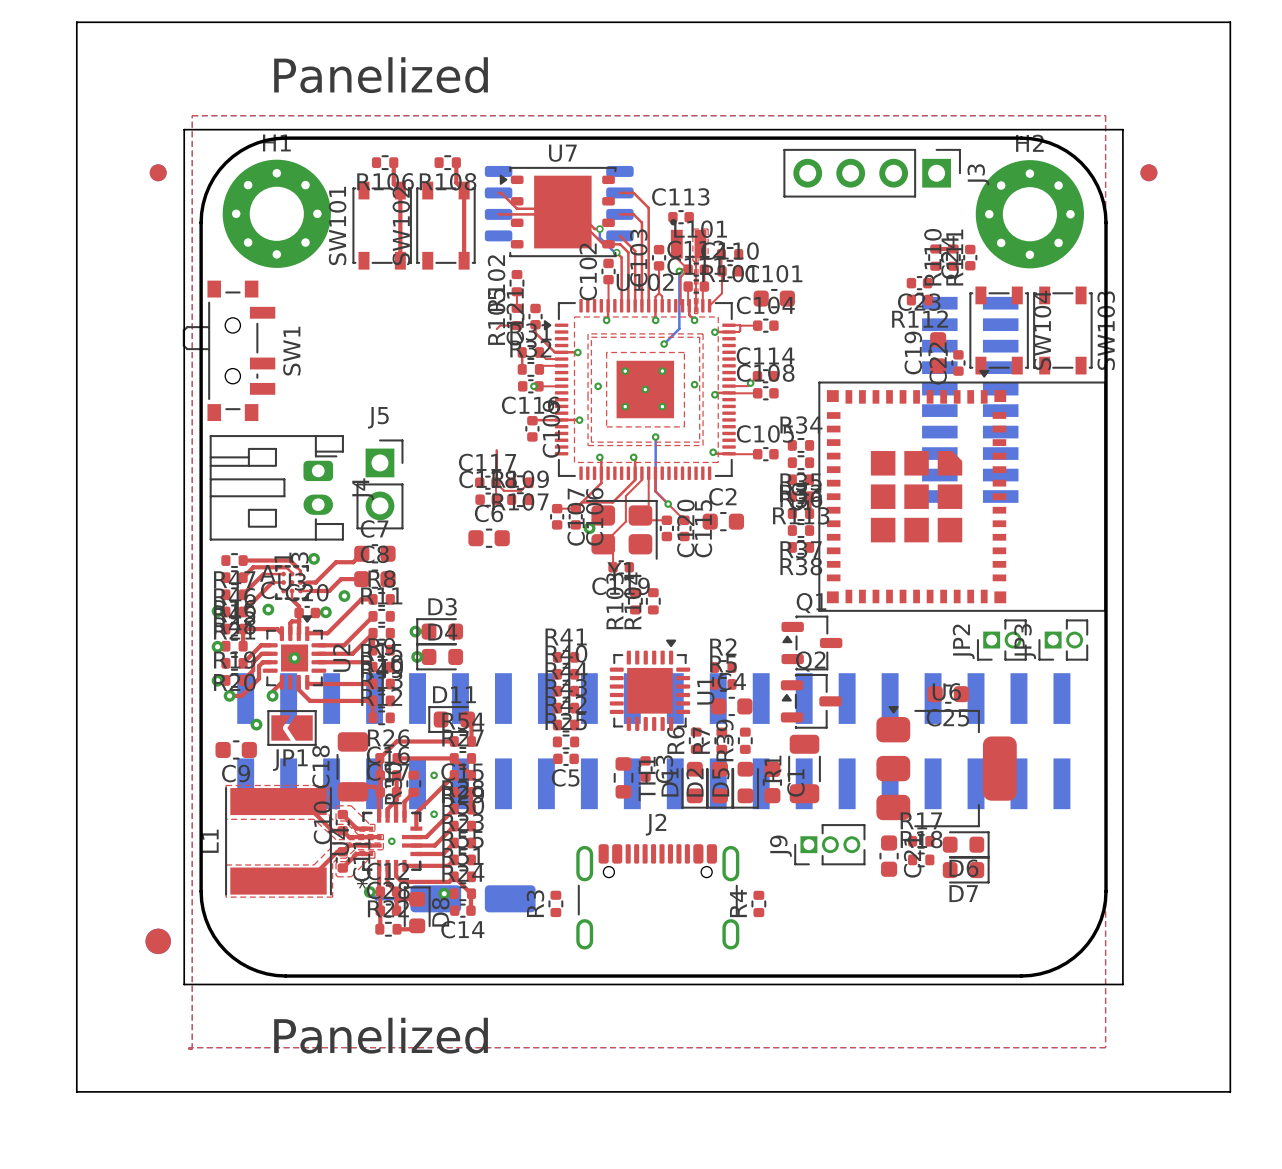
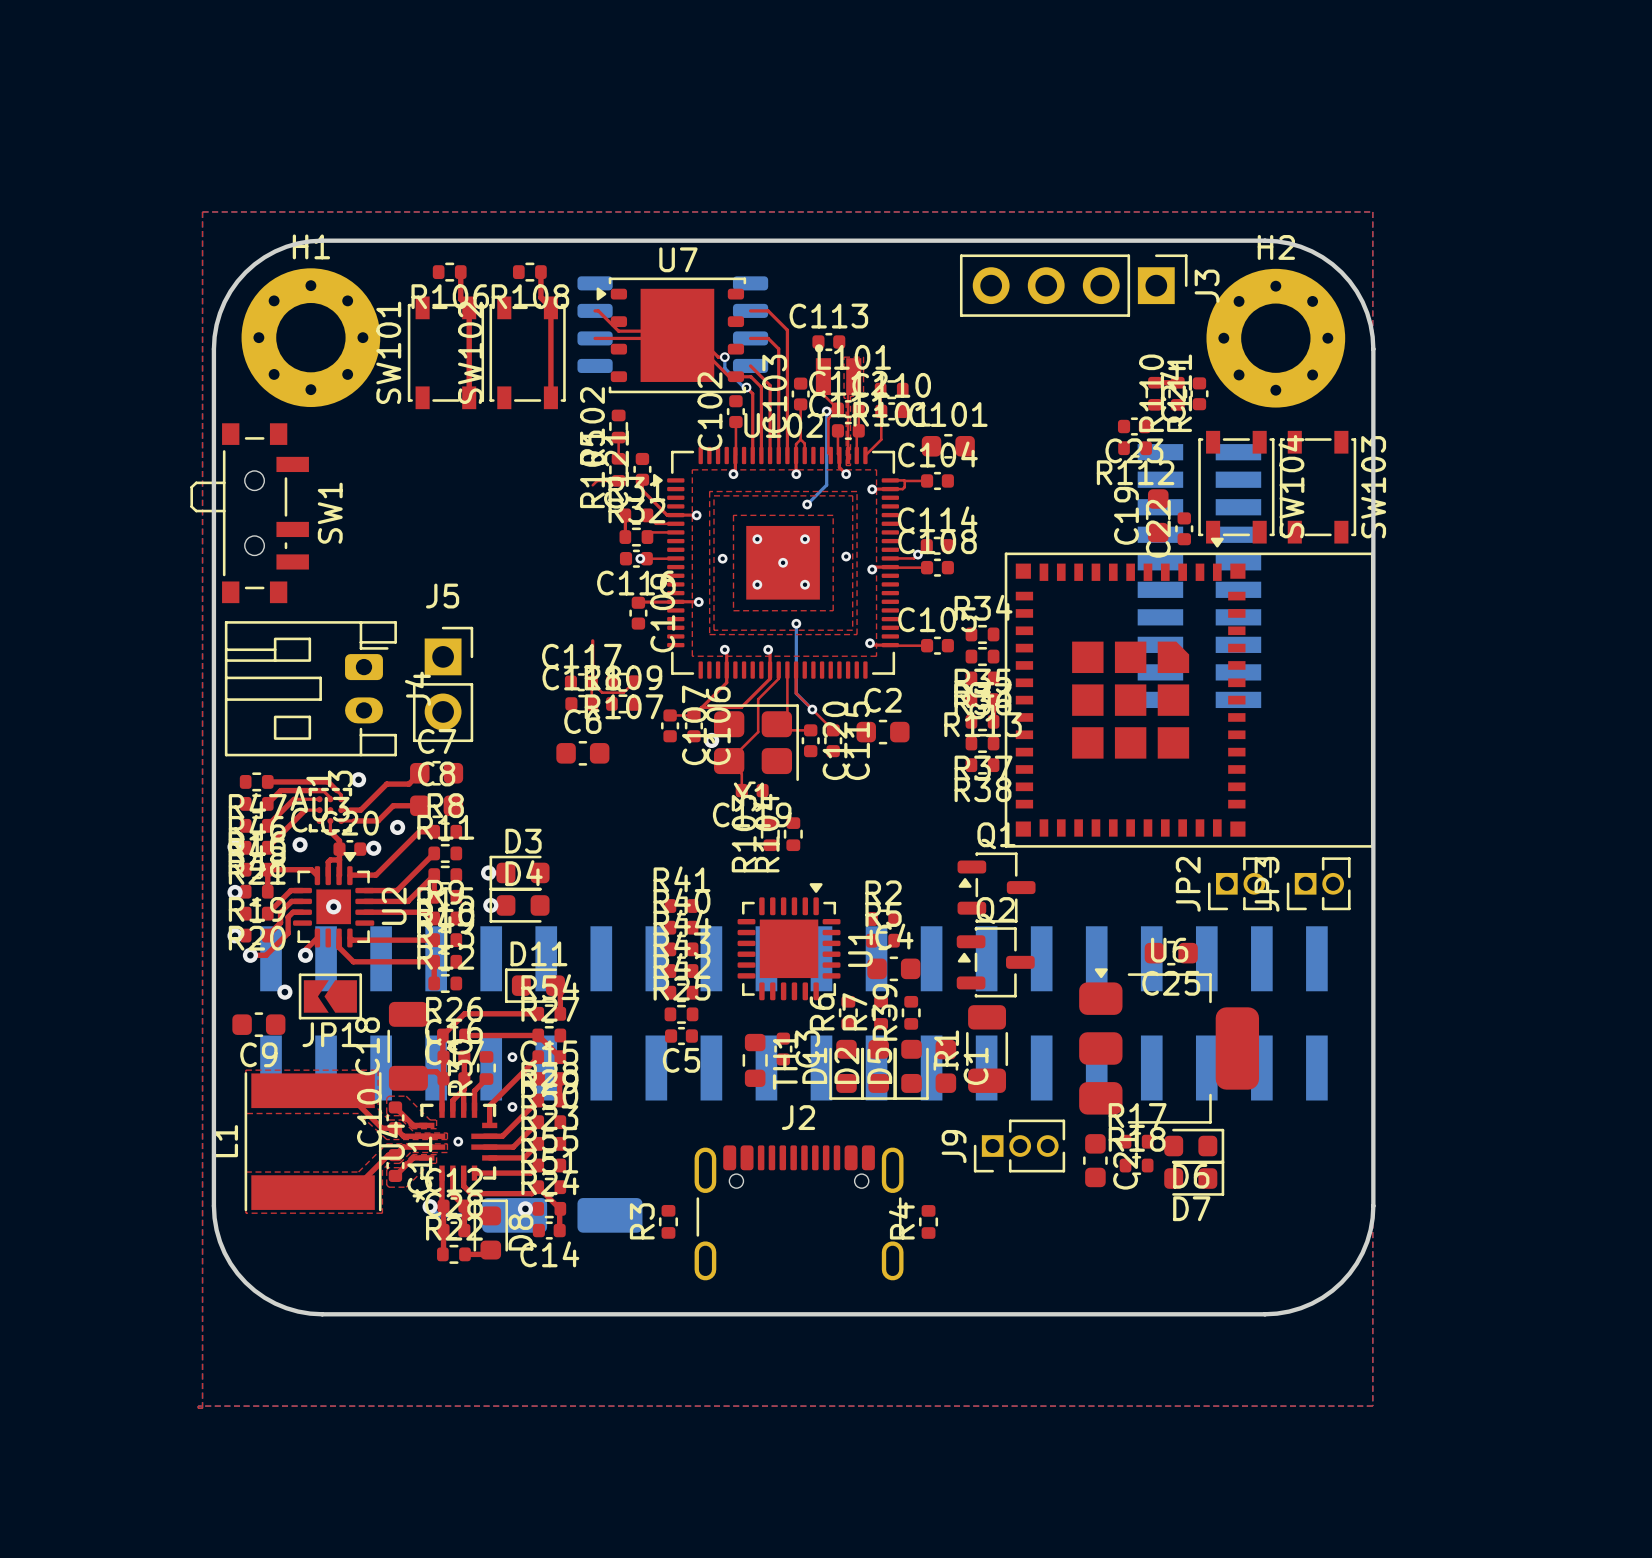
board edge: (76, 22) (1230, 22) (1230, 1091) (76, 1091) (76, 22) -> none
text: Panelized (381, 75) -> none
board edge: (184, 129) (1122, 129) (1122, 984) (184, 984) (184, 129) -> none
part: (158, 172) -> none
part: (1148, 172) -> none
part: (158, 941) -> none
text: Panelized (381, 1035) -> none

